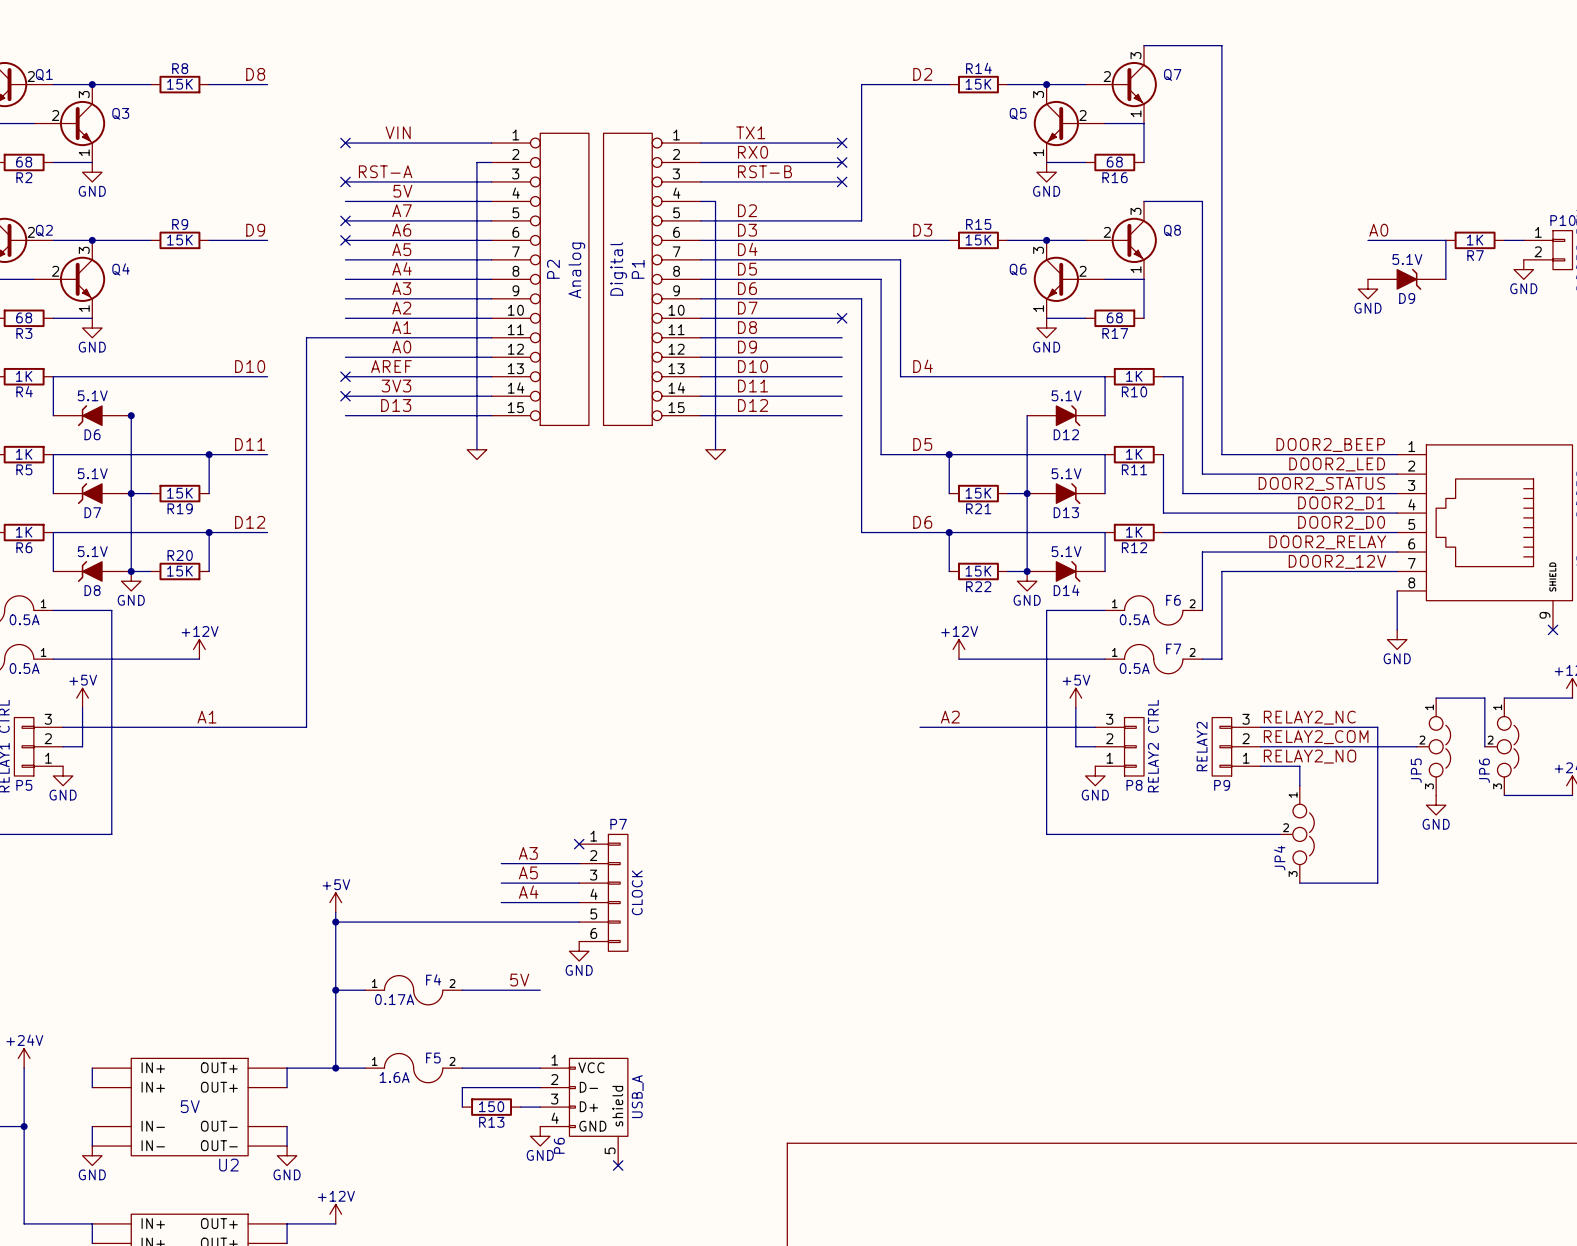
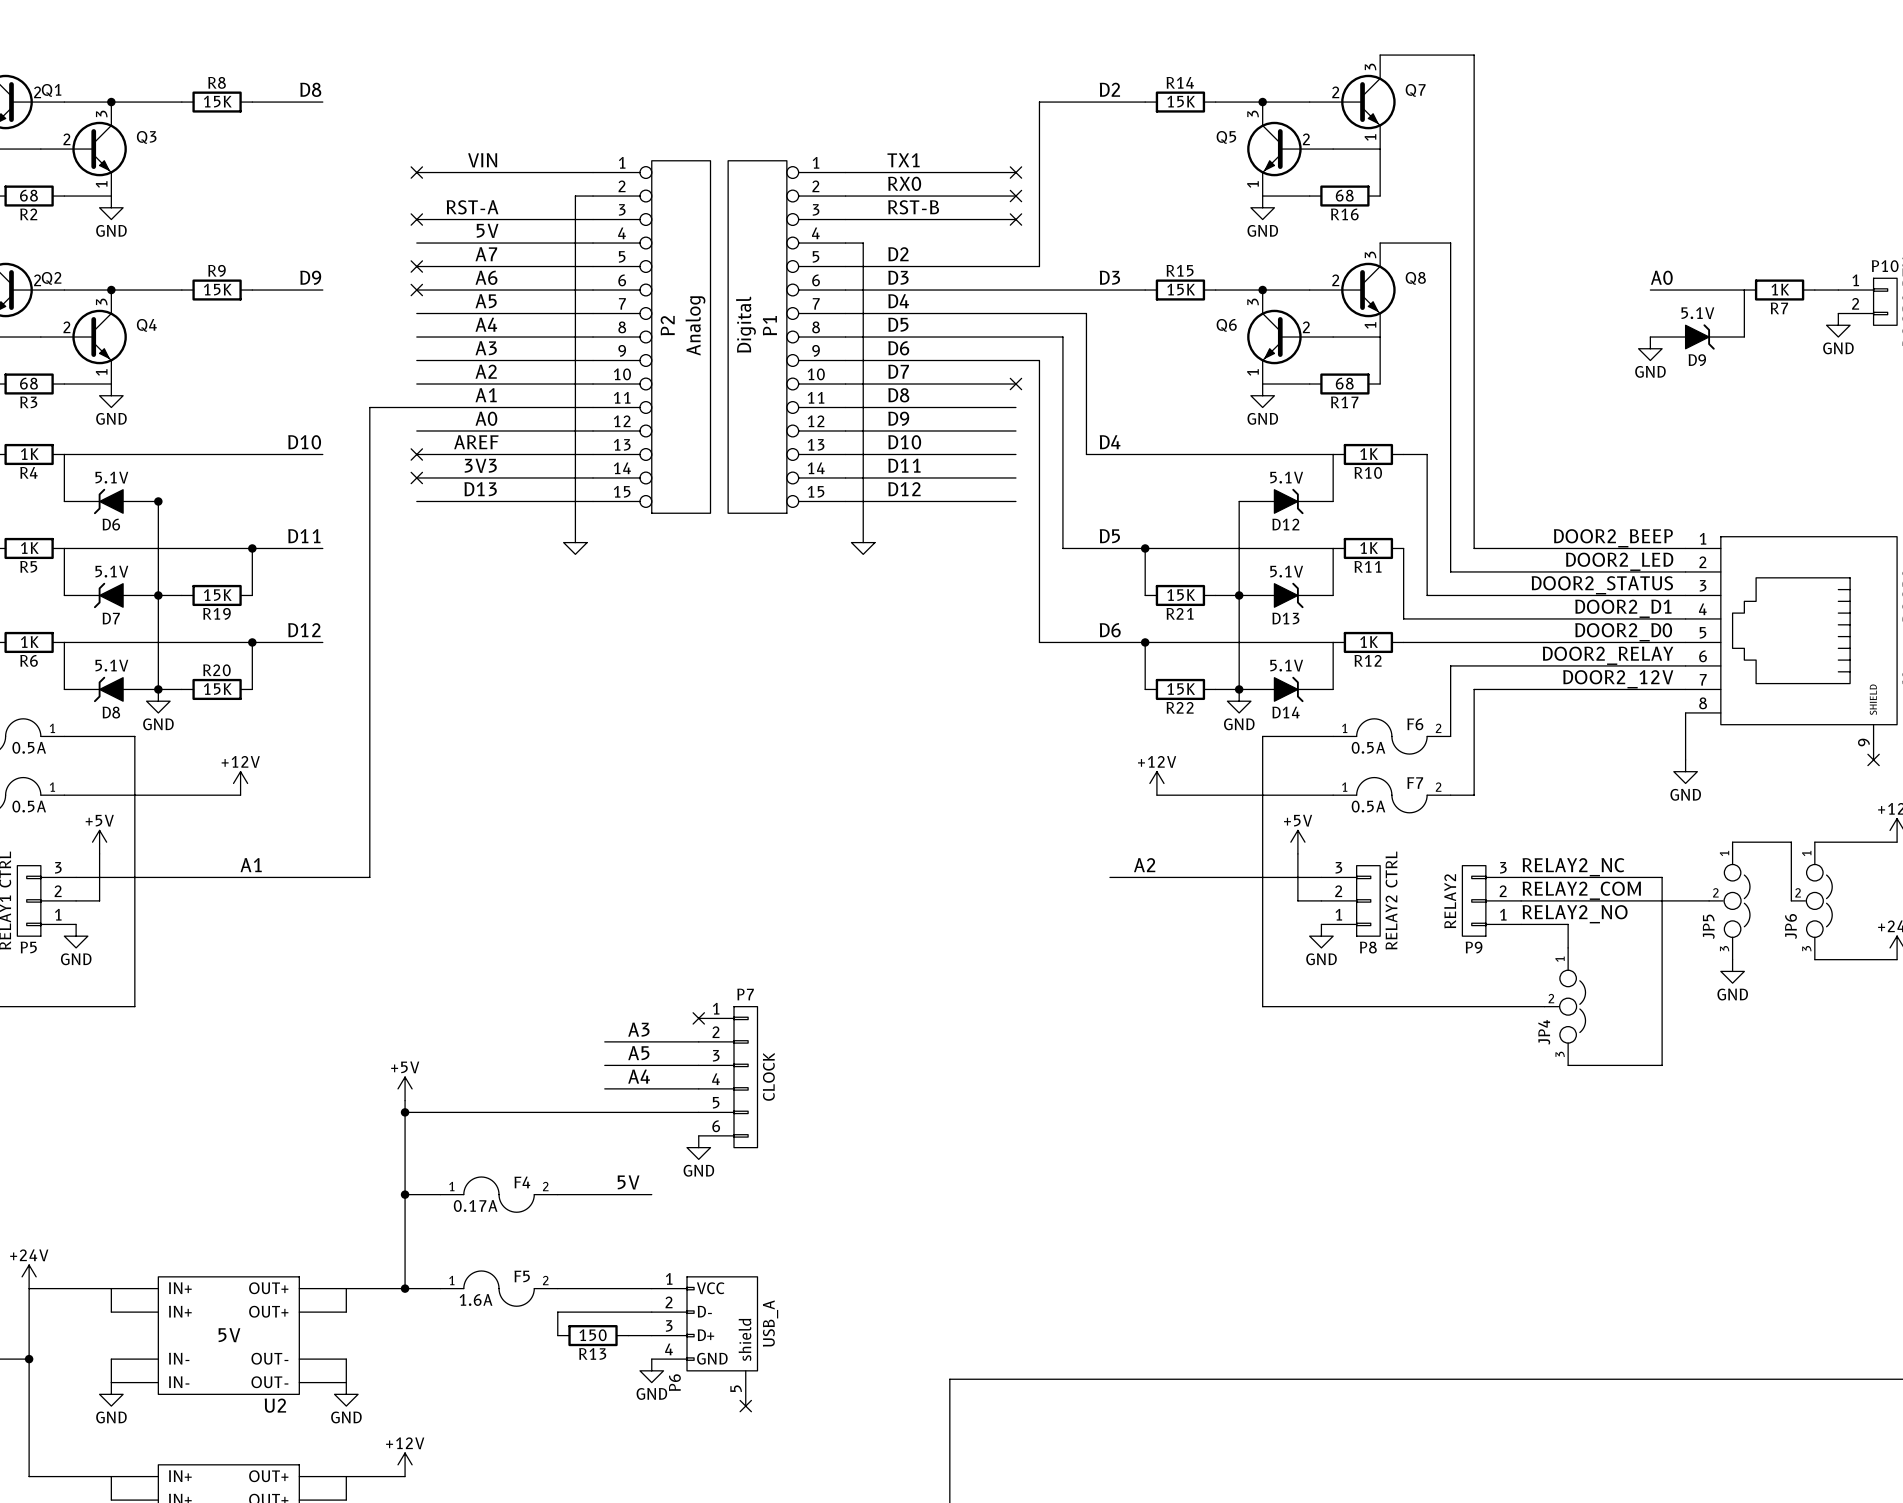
wire: none -> (29, 1288) (111, 1288)

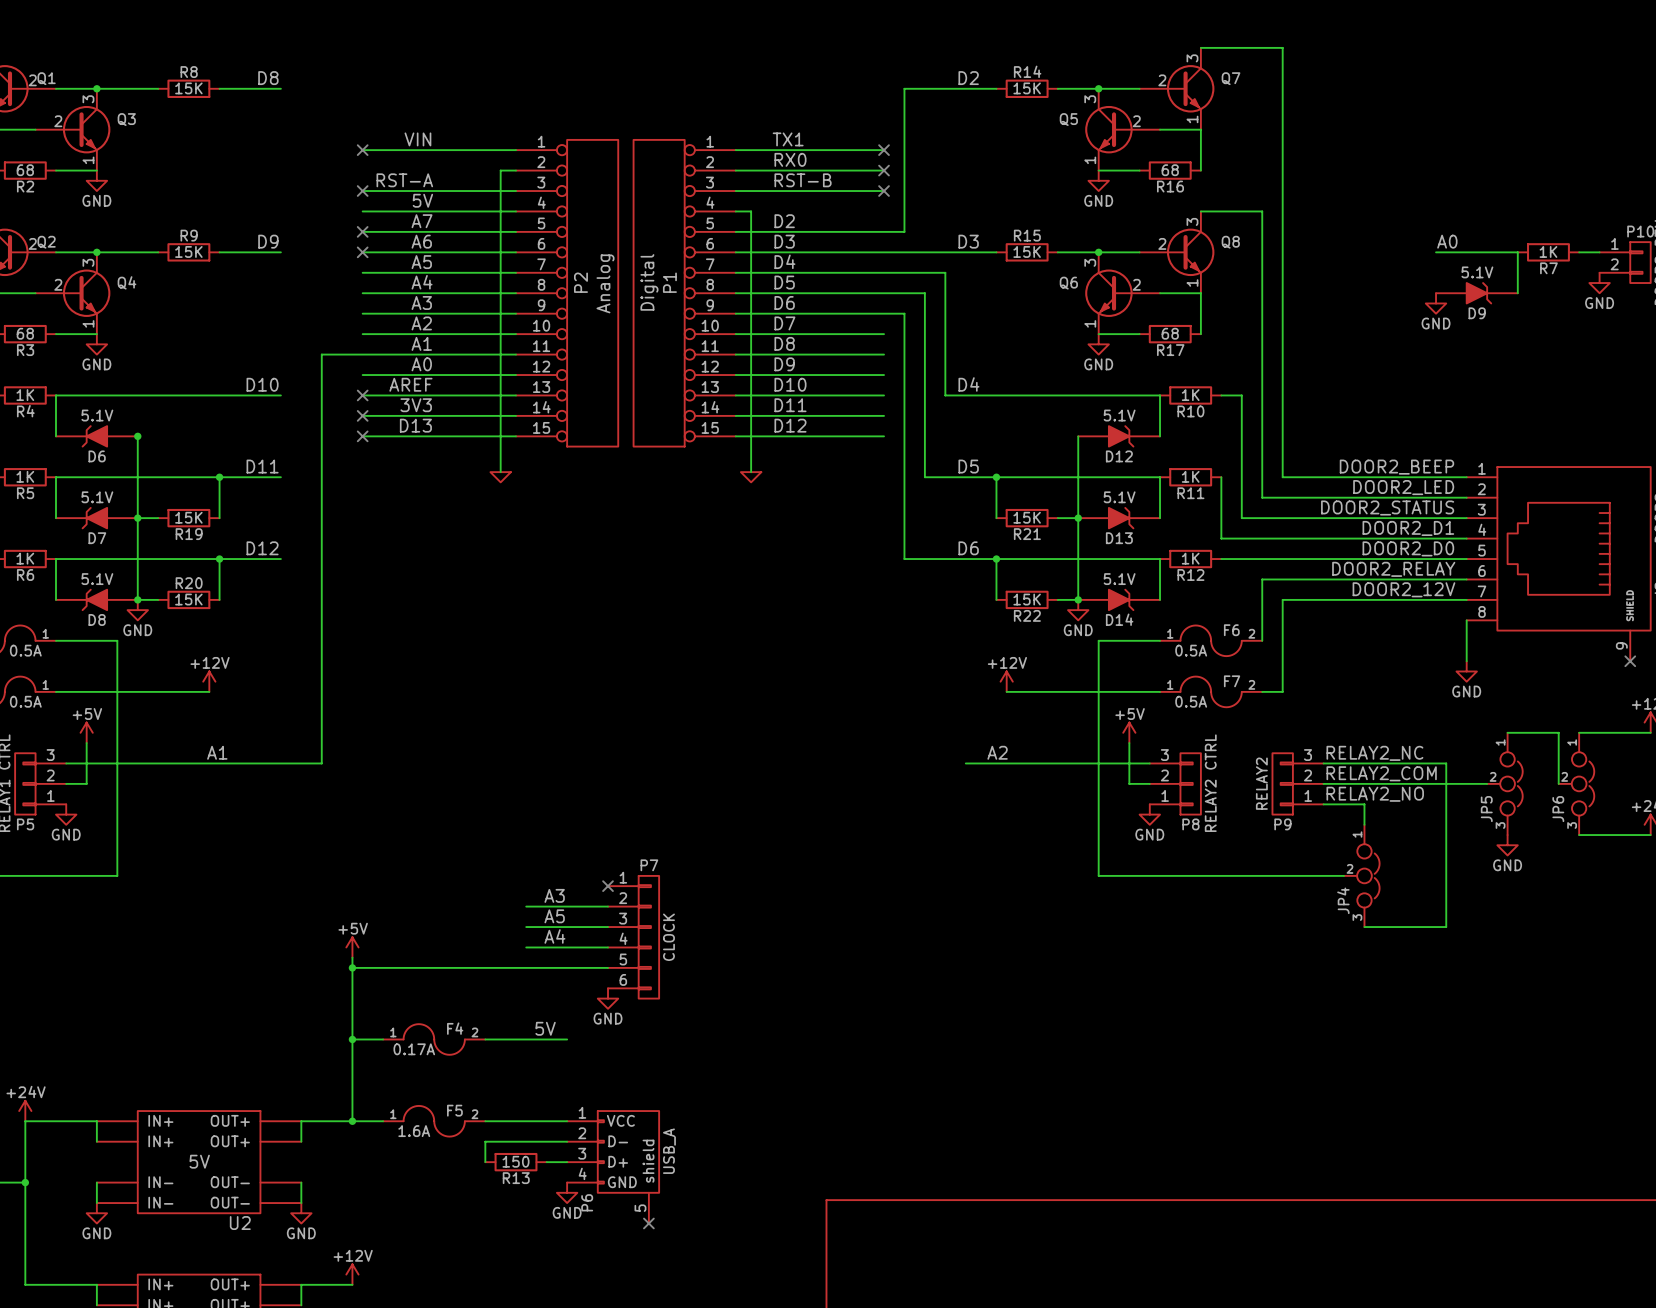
no-connect mark: (1015, 384) -> none
no-connect mark: none -> (362, 436)

